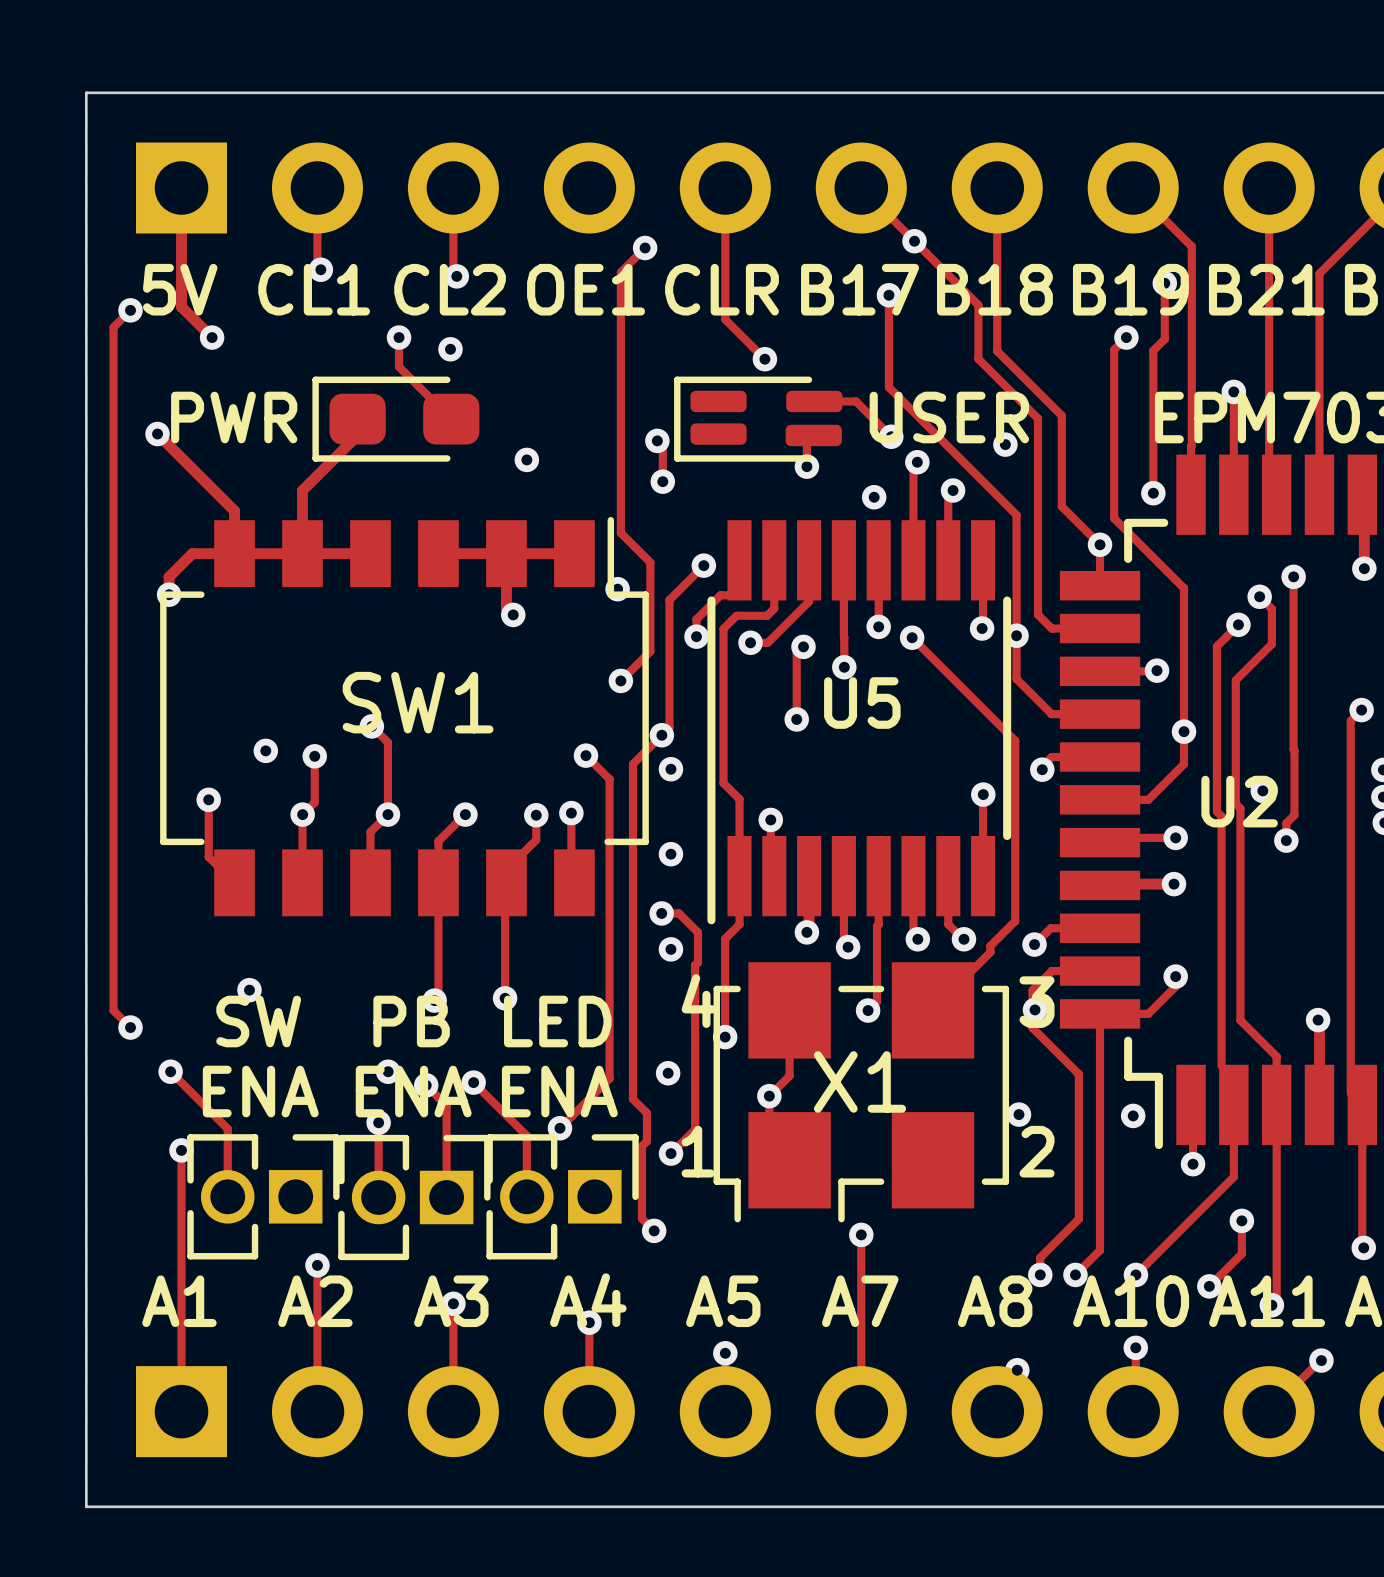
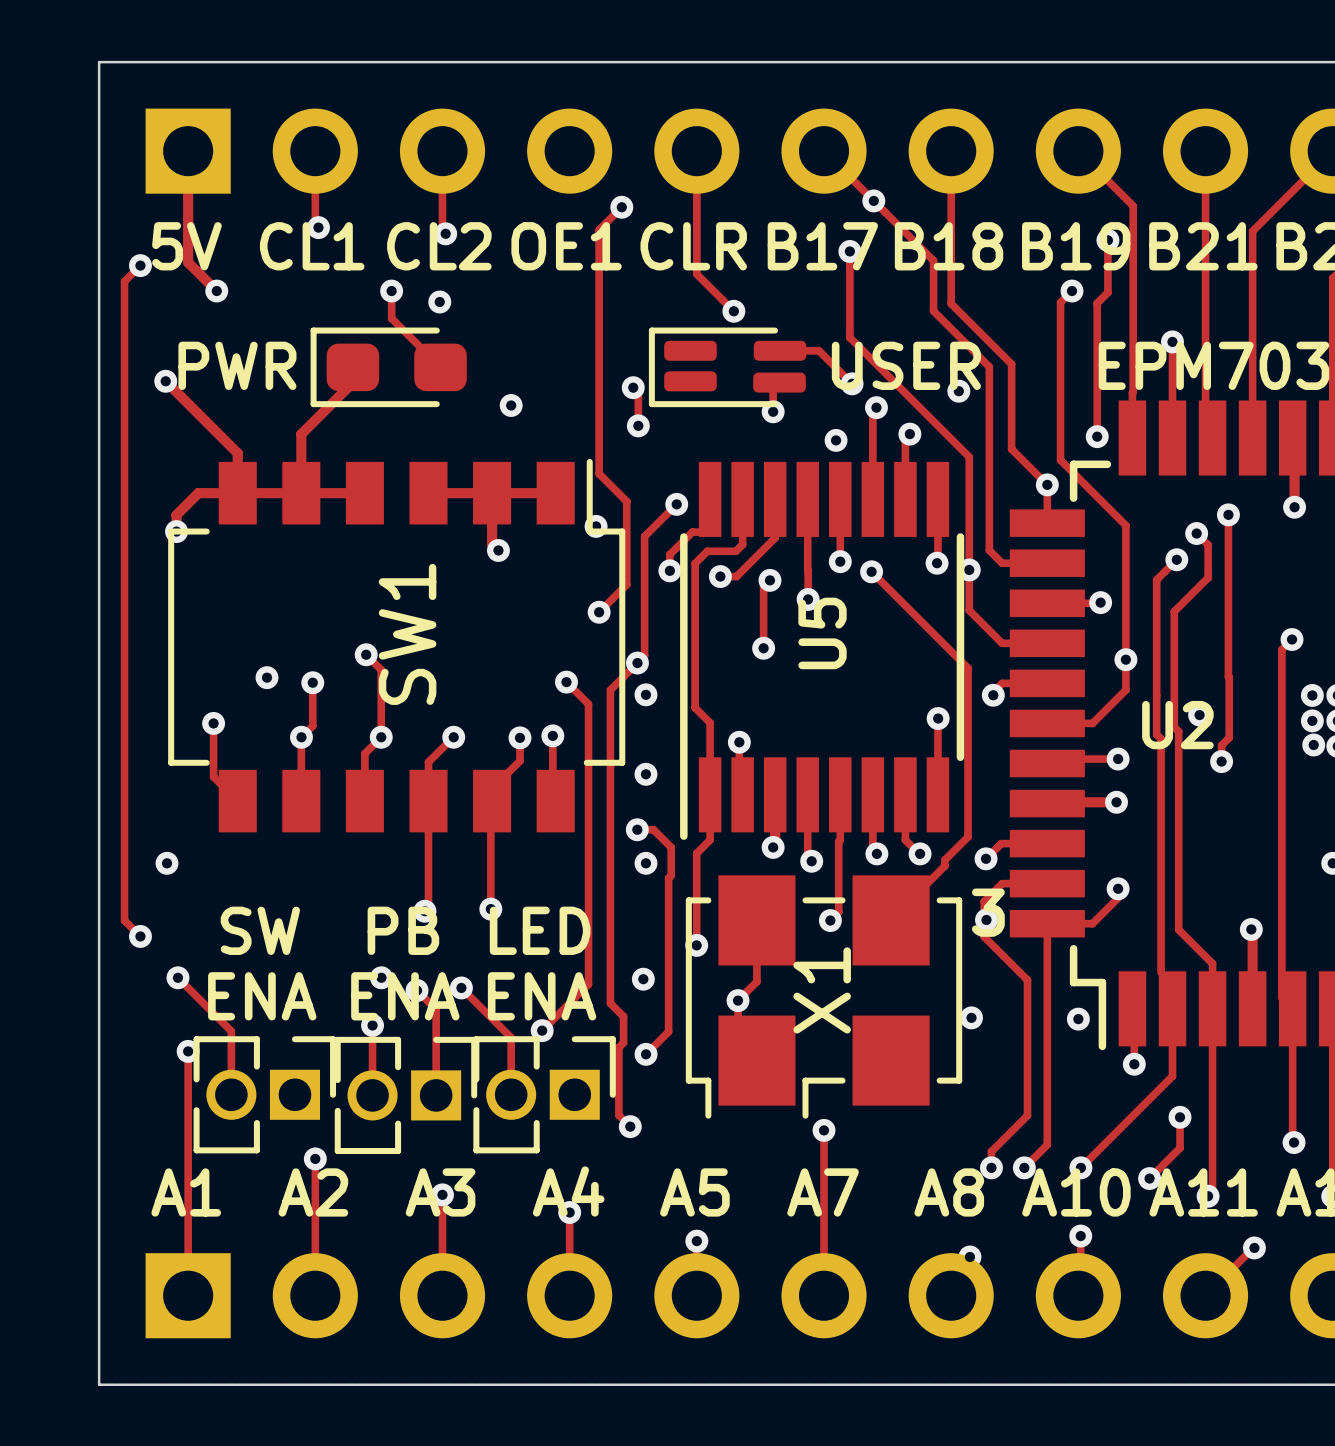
SW1 name rotation: 0° (418, 702) -> 90° counterclockwise (407, 634)
U5 name rotation: 0° (862, 703) -> 90° counterclockwise (822, 633)
via position: (249, 990) -> (167, 863)
text: 4 (699, 1001) -> none
X1 name rotation: 0° (860, 1081) -> 90° counterclockwise (822, 990)
text: 1 (698, 1151) -> none
text: 2 (1037, 1151) -> none

